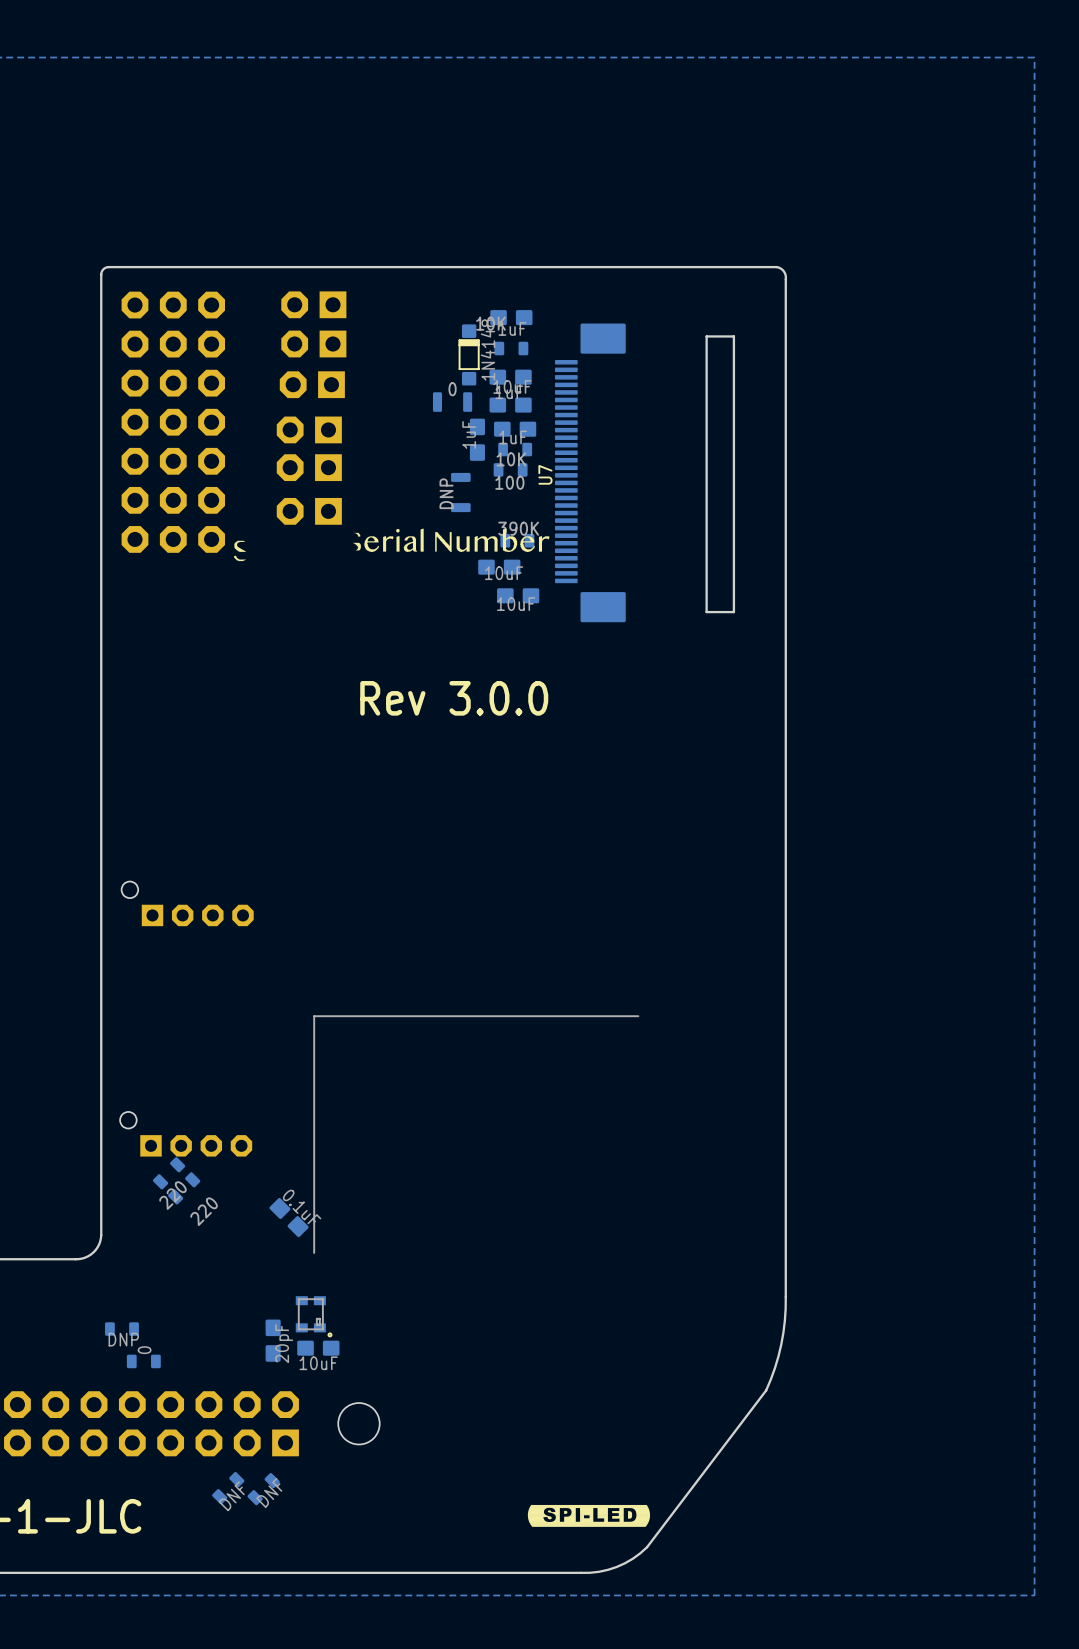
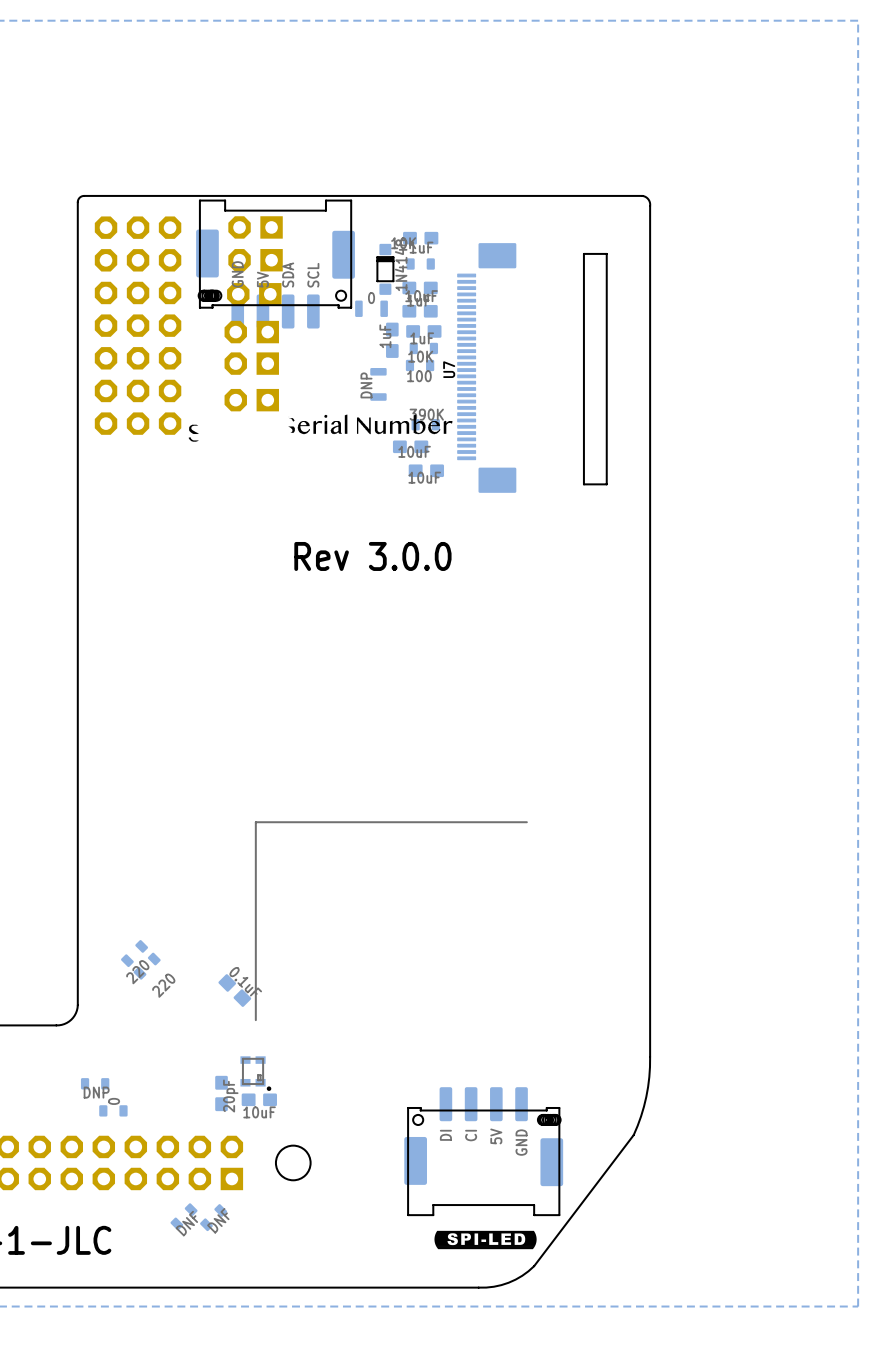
part: none -> (275, 264)
part: (187, 903) -> none
part: (186, 1134) -> none
part: none -> (483, 1151)

